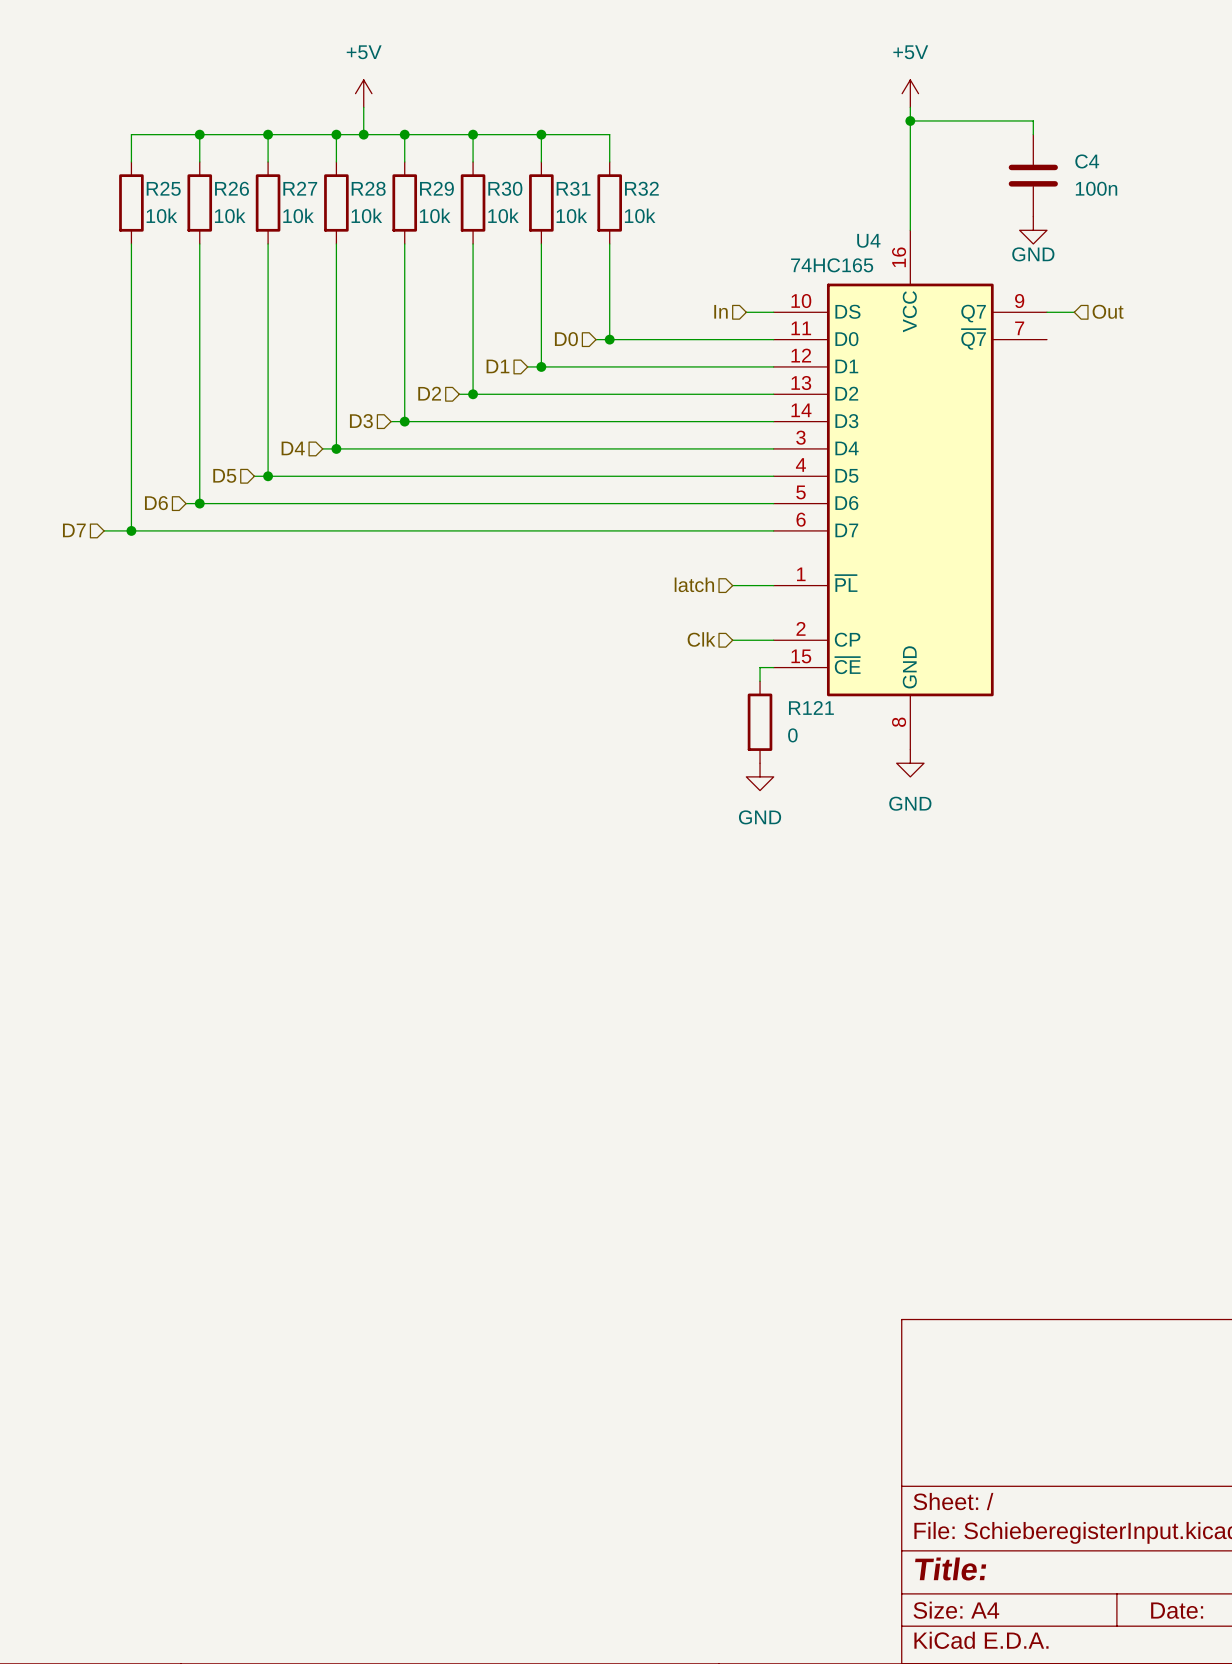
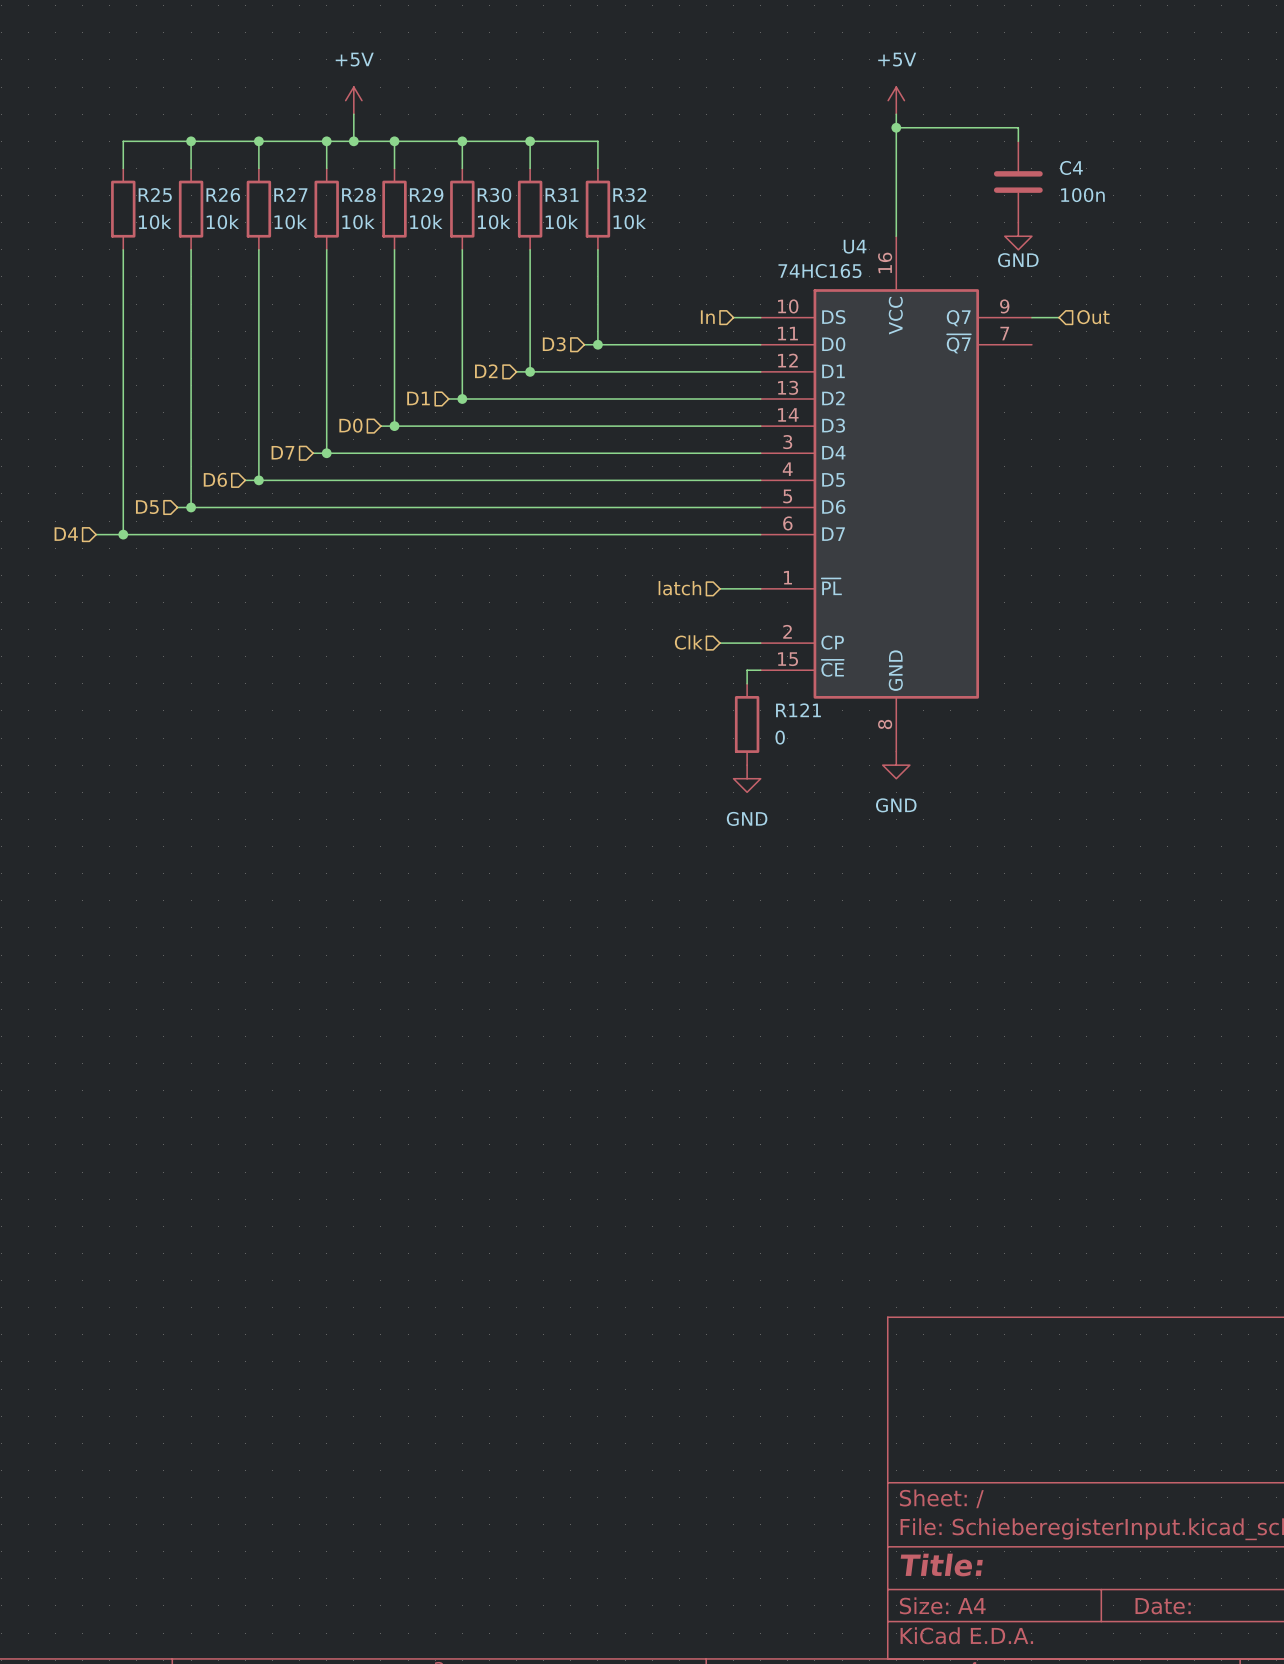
hierarchical label: D0 (566, 339) -> D3 (554, 344)
hierarchical label: D1 (497, 366) -> D2 (486, 371)
hierarchical label: D2 (429, 393) -> D1 (418, 398)
hierarchical label: D3 (361, 421) -> D0 (350, 425)
hierarchical label: D4 (293, 448) -> D7 (282, 452)
hierarchical label: D5 (224, 475) -> D6 (215, 479)
hierarchical label: D6 (156, 503) -> D5 (147, 507)
hierarchical label: D7 (74, 530) -> D4 (66, 534)

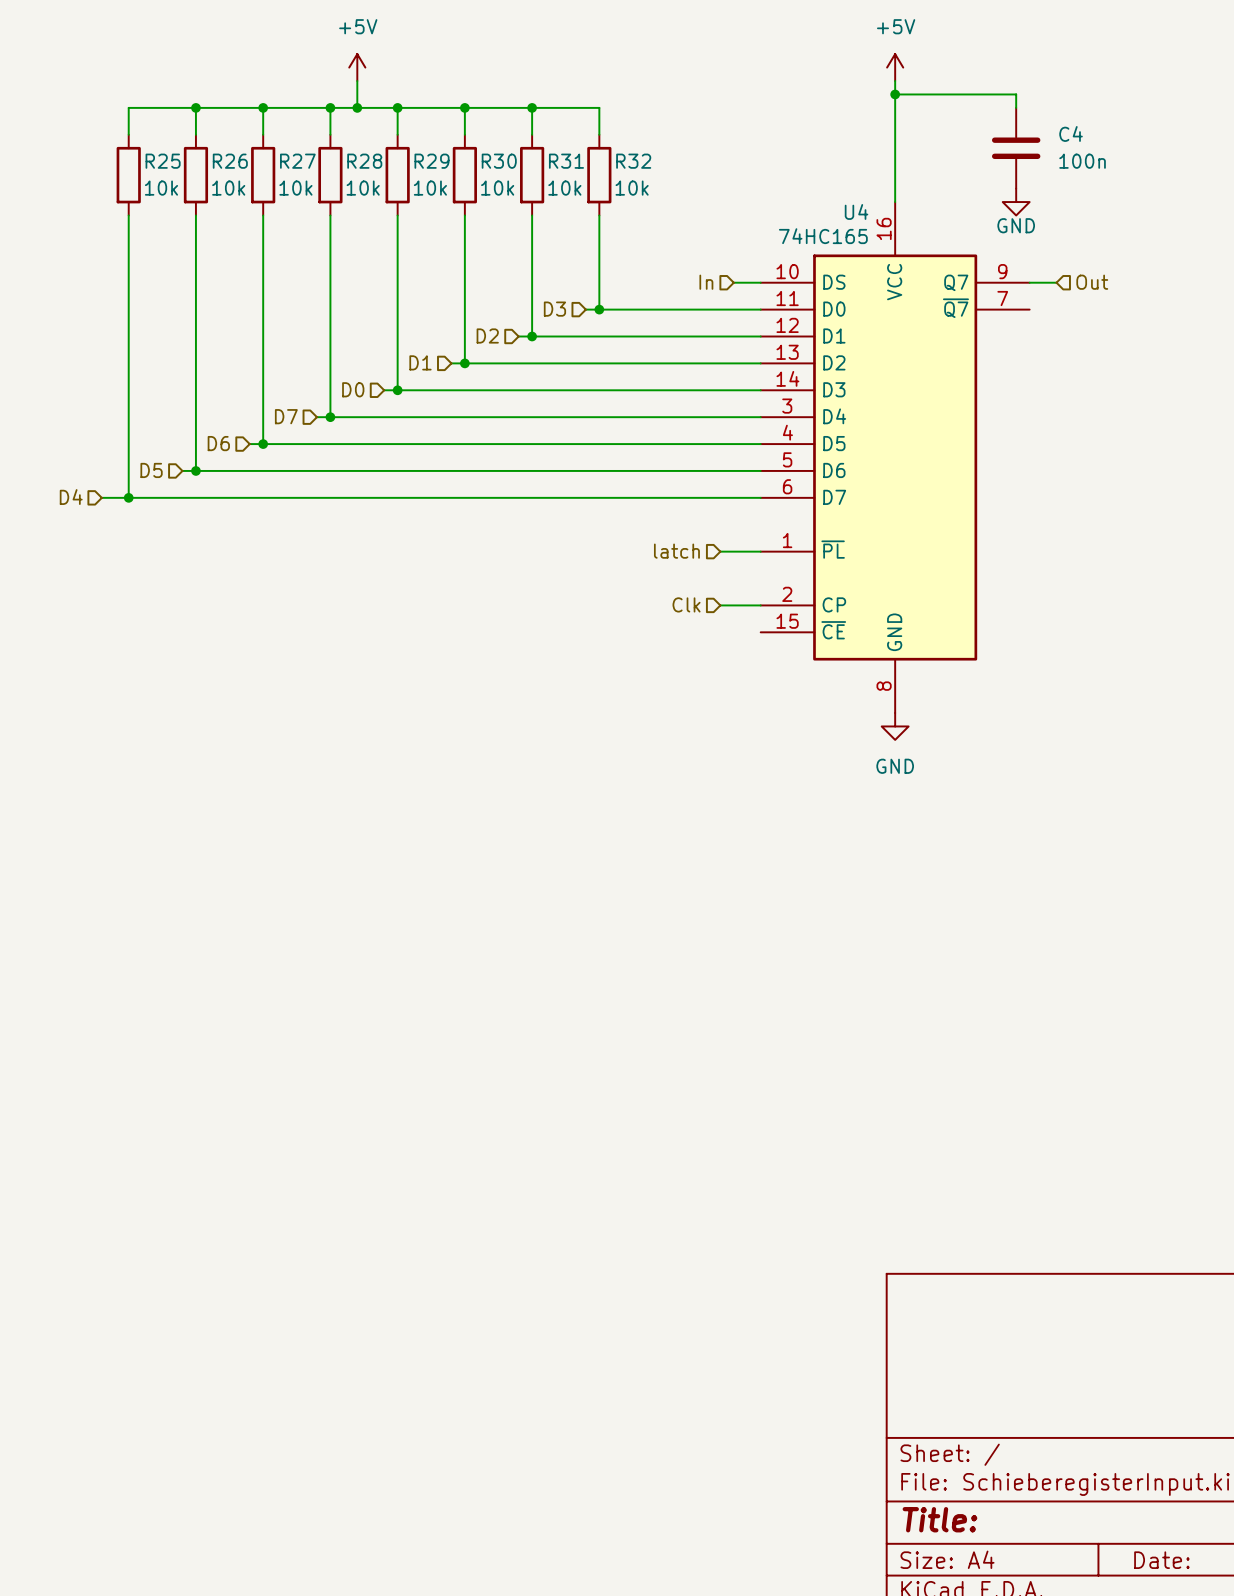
wire: (760, 670) (747, 670) (747, 683) -> none
R121: 0 (747, 724) -> none
power symbol: GND (747, 778) -> none

